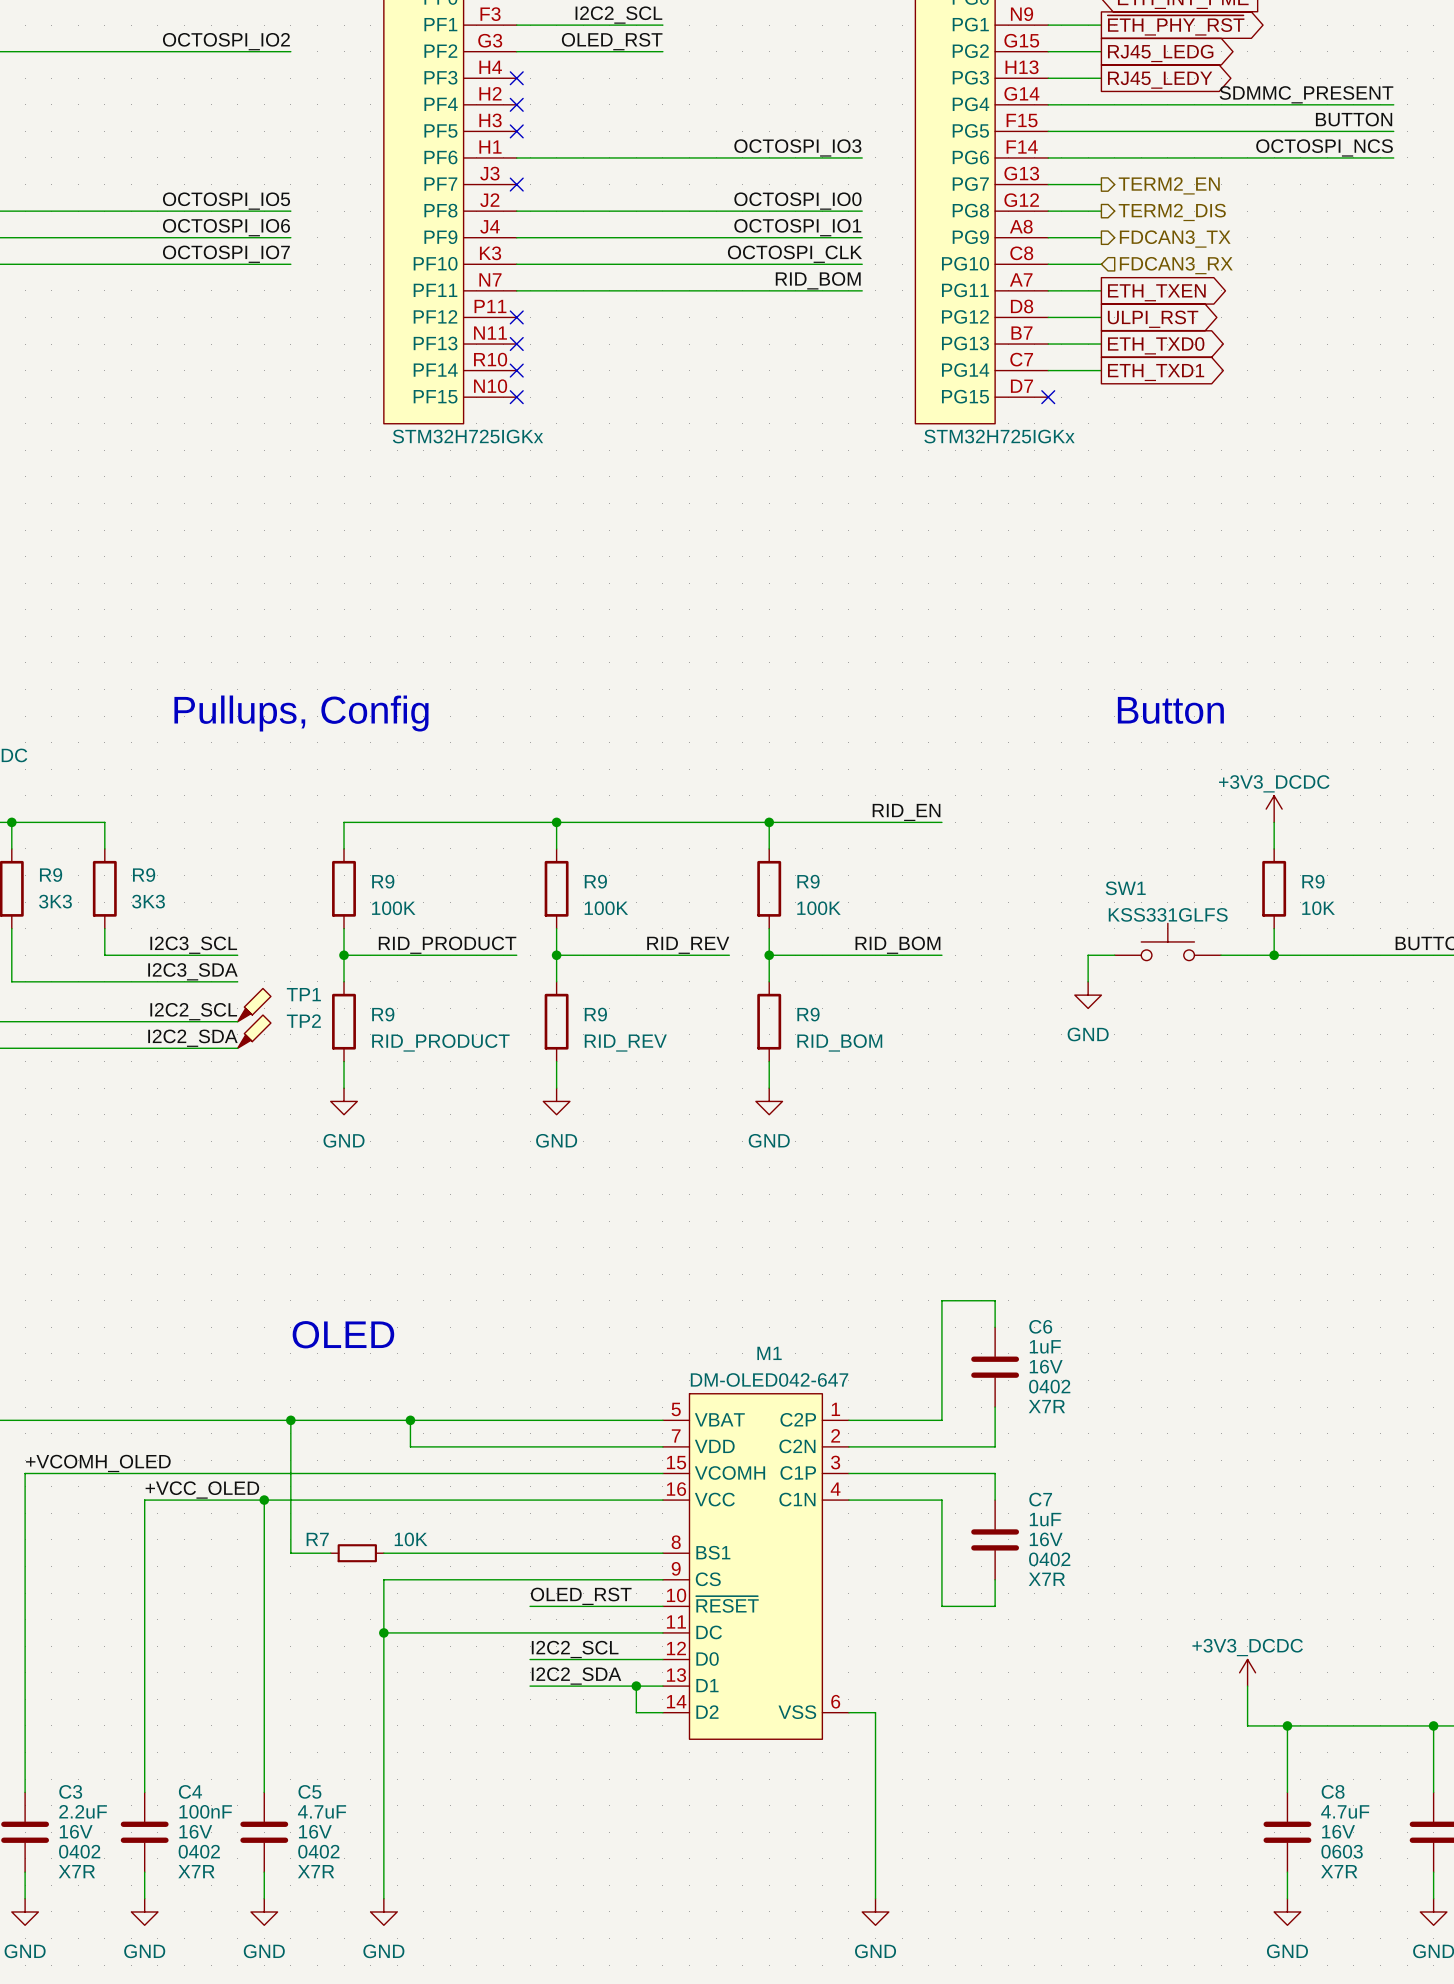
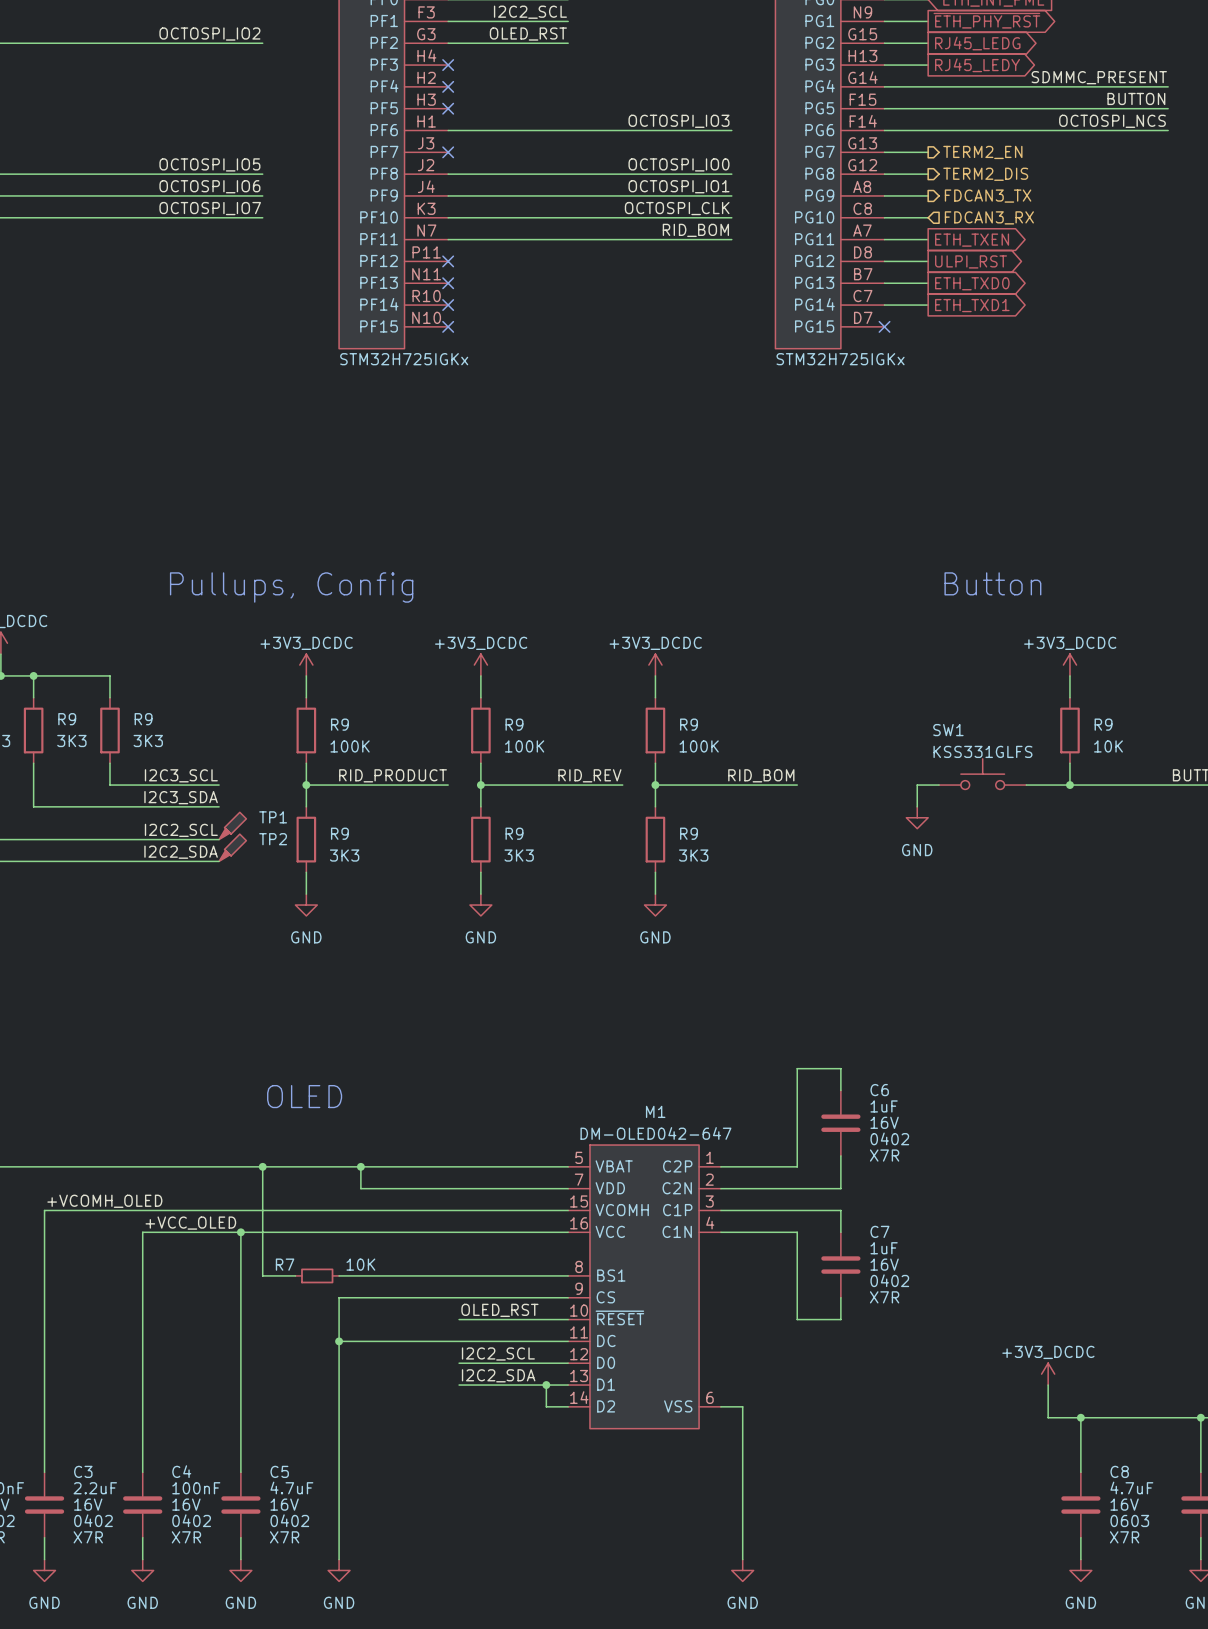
power symbol: none -> +3V3_DCDC (306, 665)
power symbol: none -> +3V3_DCDC (480, 665)
power symbol: none -> +3V3_DCDC (655, 665)
label: RID_EN (906, 812) -> none
wire: (344, 822) (941, 822) -> none
junction: (556, 822) -> none
junction: (769, 822) -> none
R9 value: RID_PRODUCT (440, 1042) -> 3K3 (344, 855)
R9 value: RID_BOM (839, 1042) -> 3K3 (693, 855)
R9 value: RID_REV (625, 1043) -> 3K3 (519, 855)

